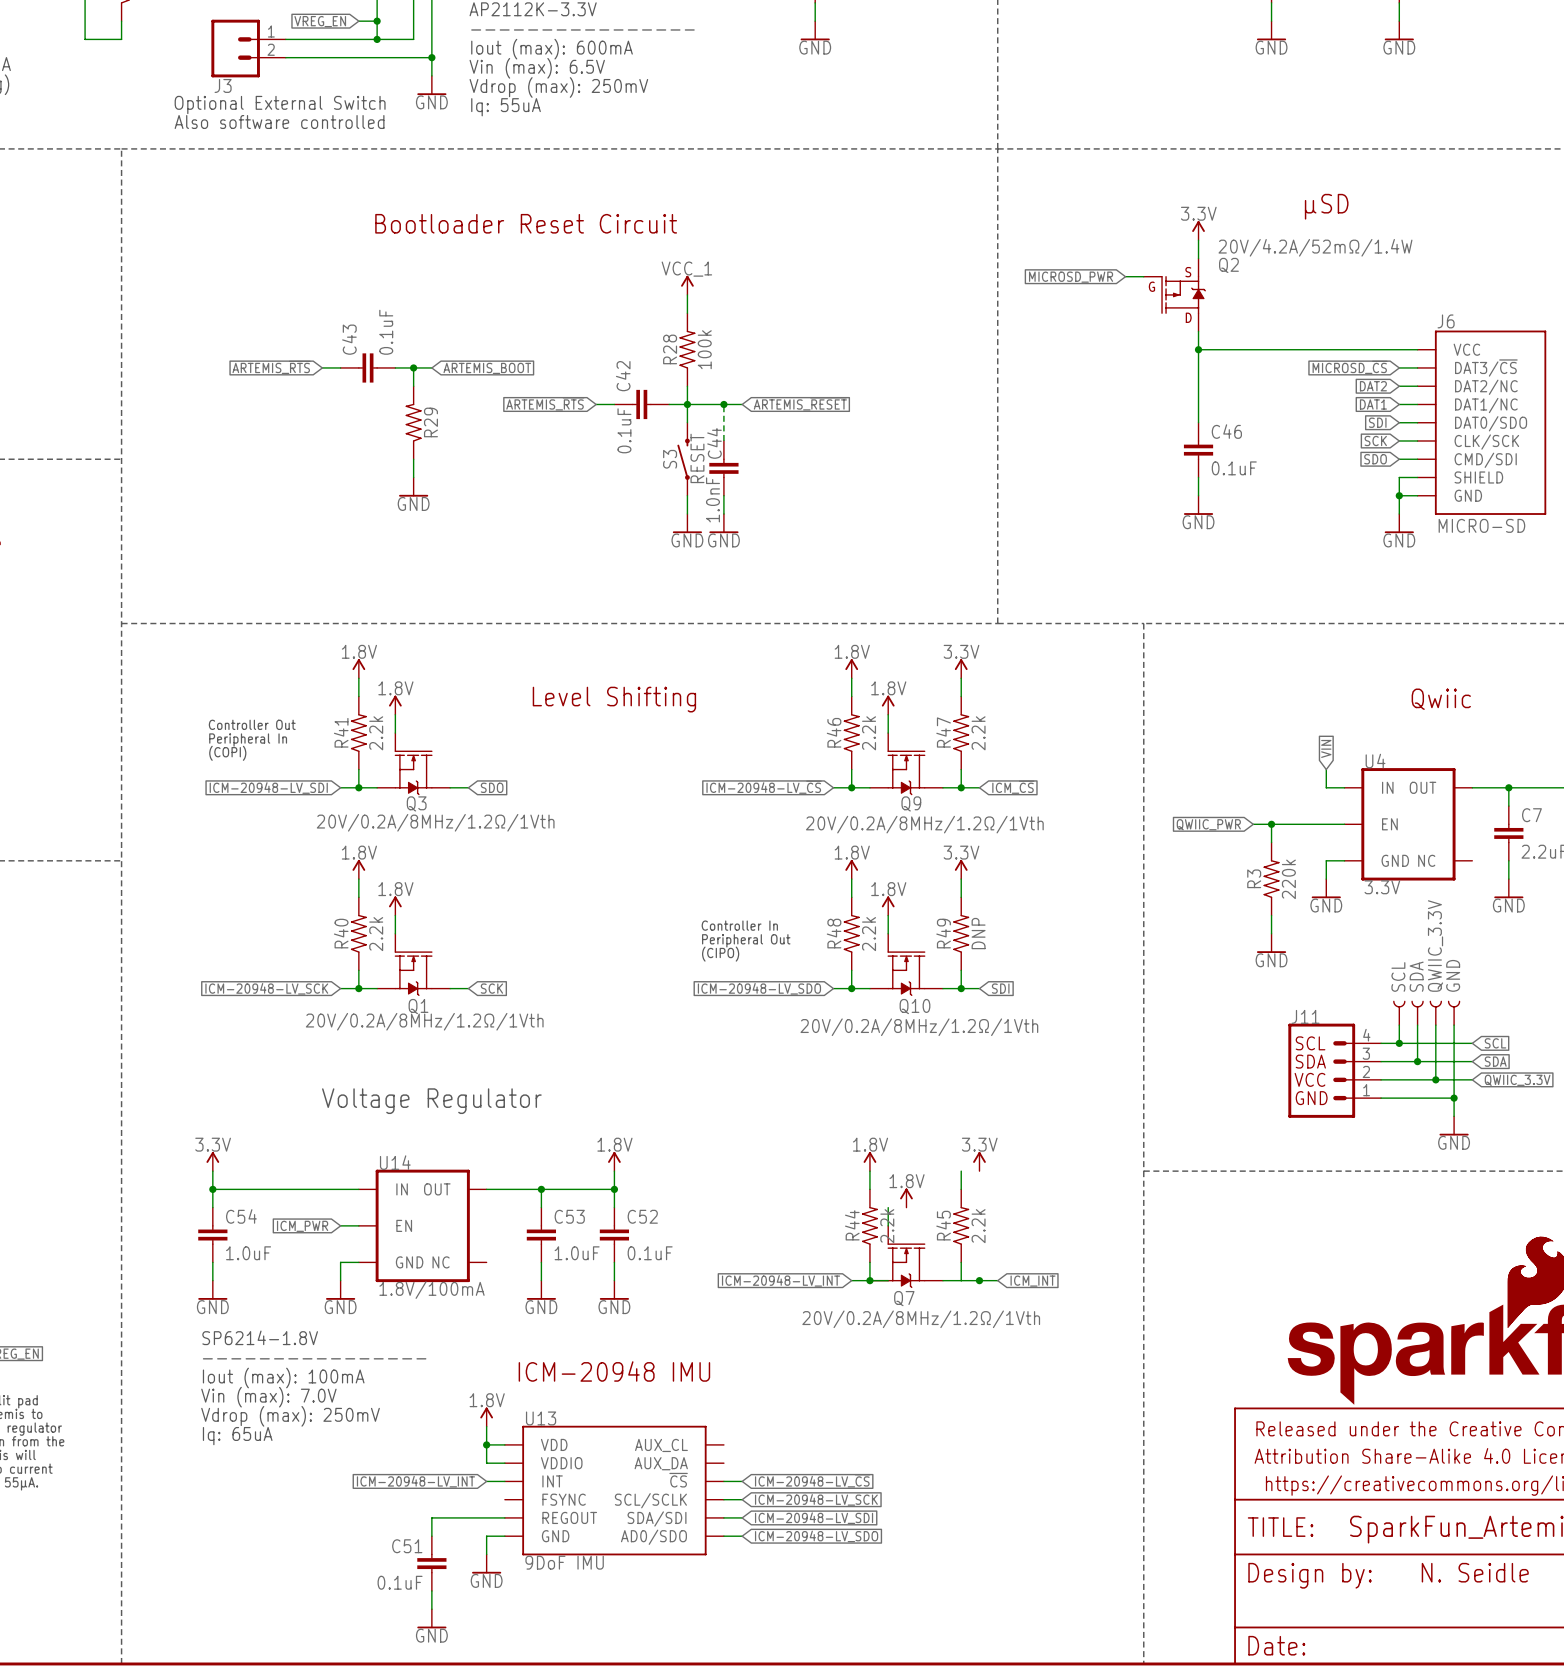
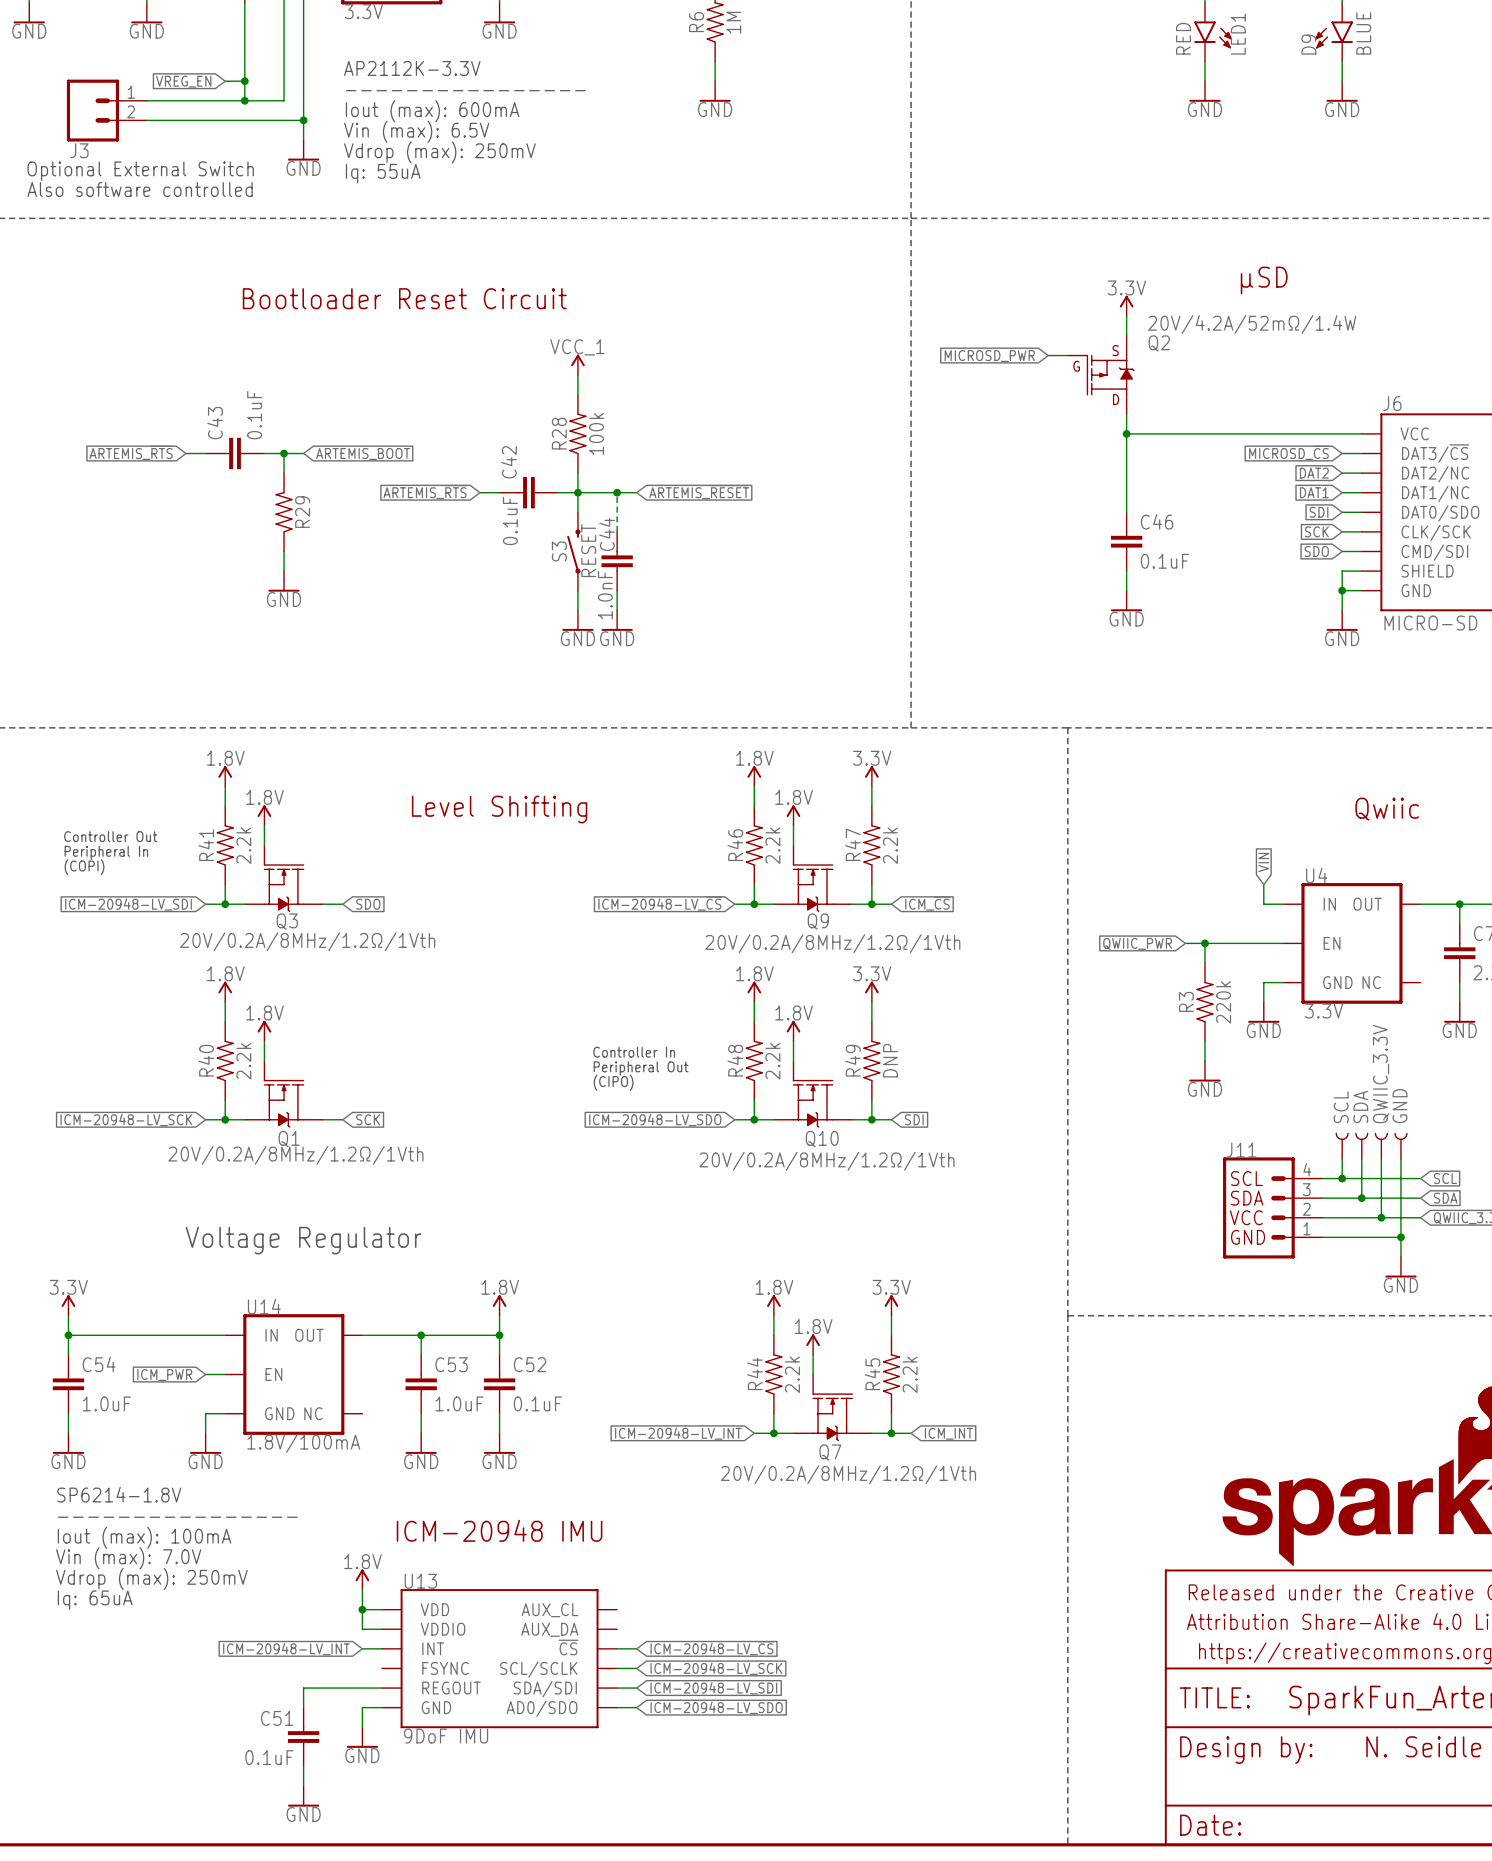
wire: (961, 1171) (961, 1189) -> (891, 1315) (891, 1335)
wire: (888, 1207) (888, 1225) -> (813, 1354) (813, 1374)
R45 position: (961, 1225) -> (891, 1374)
Q7 position: (906, 1256) -> (832, 1407)
wire: (961, 1262) (961, 1280) (942, 1280) -> none
wire: none -> (891, 1413) (891, 1433)

